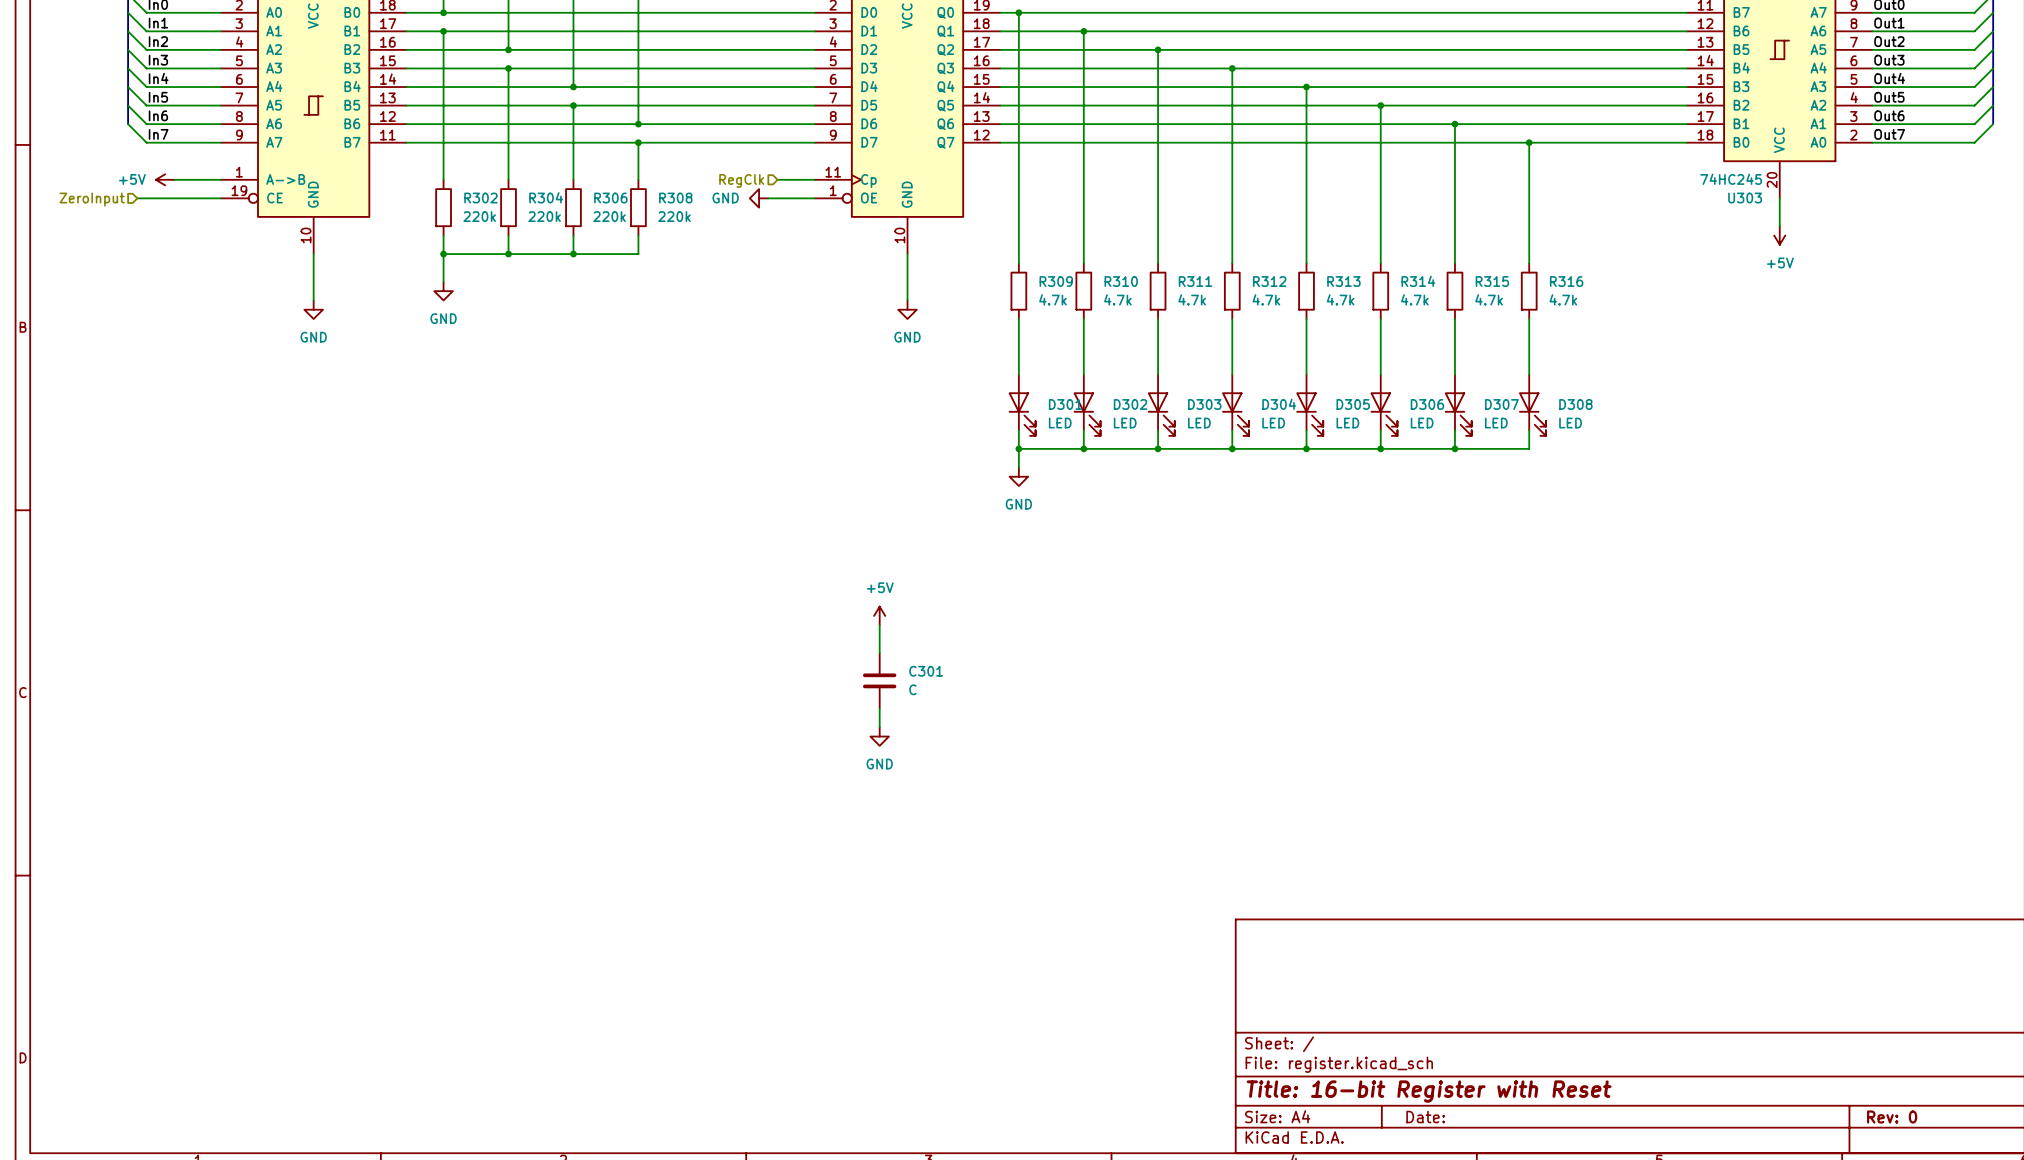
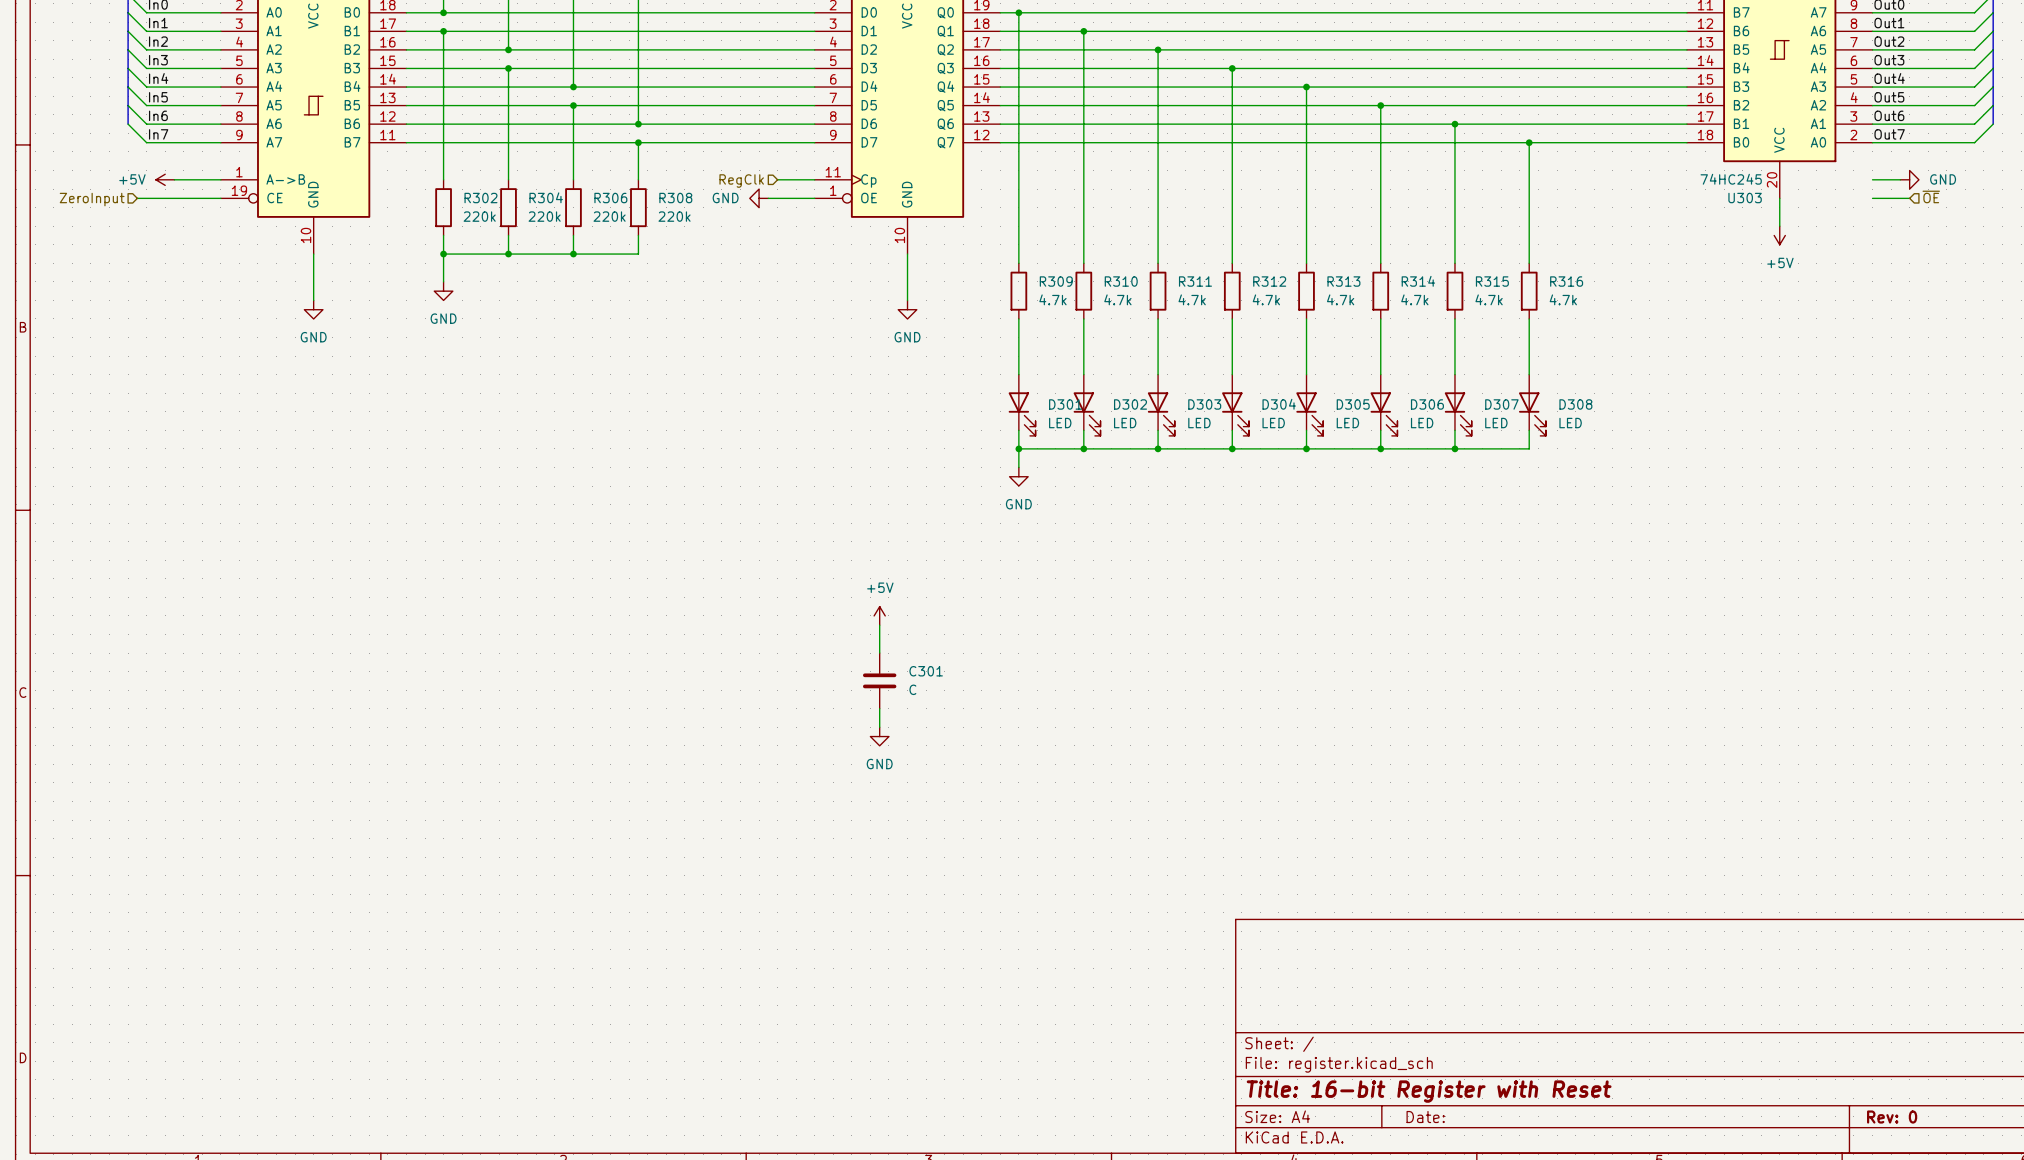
wire: none -> (1872, 179) (1900, 179)
power symbol: none -> GND (1909, 179)
hierarchical label: none -> ~{OE} (1931, 196)
wire: none -> (1872, 198) (1909, 198)

